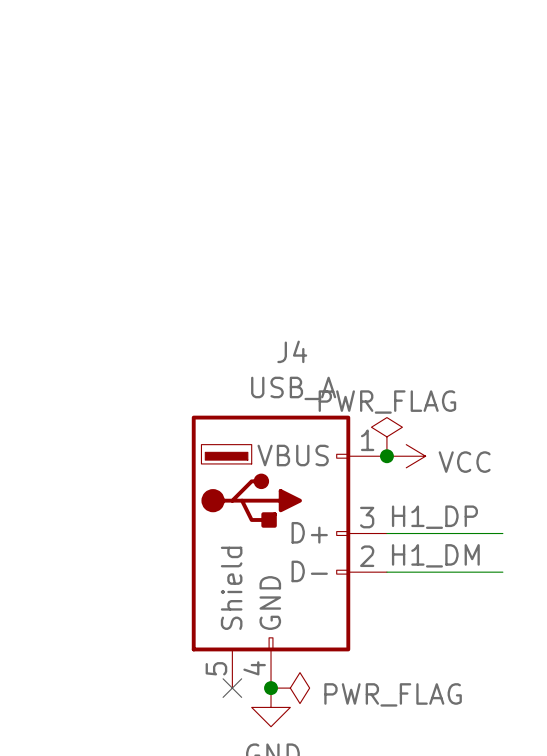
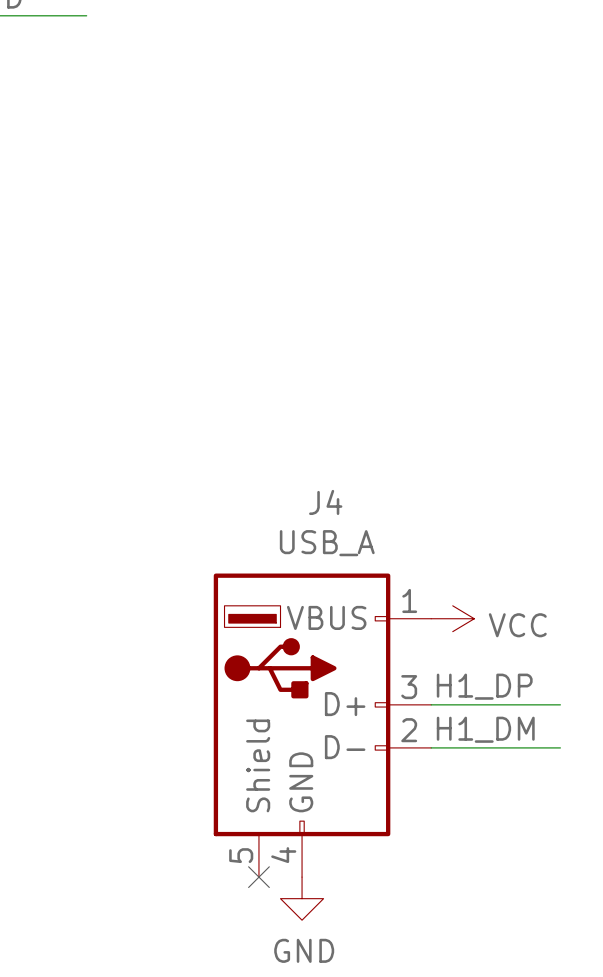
power symbol: PWR_FLAG (386, 436) -> none
junction: (386, 456) -> none
junction: (271, 688) -> none
power symbol: PWR_FLAG (290, 688) -> none

